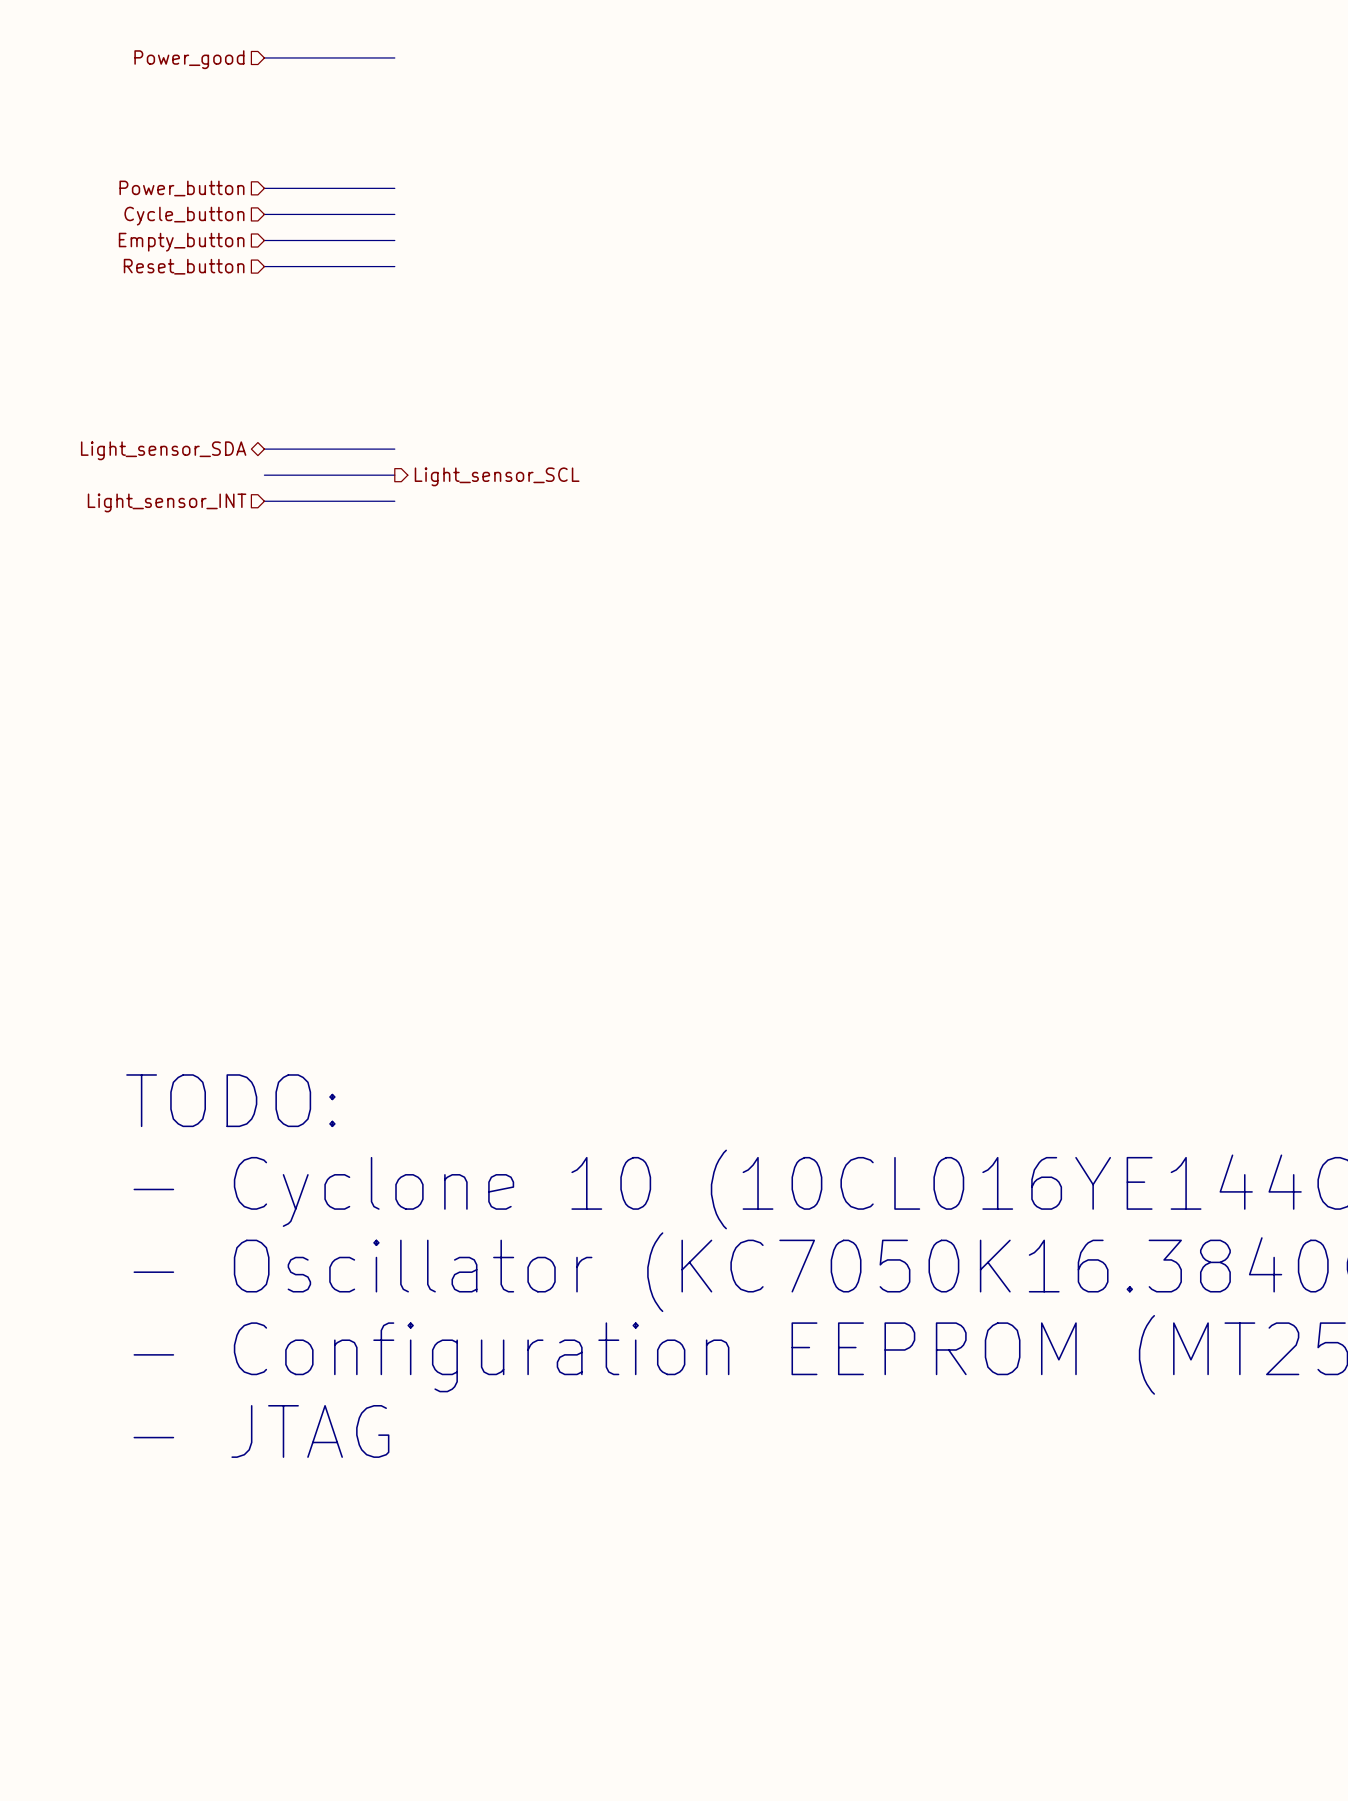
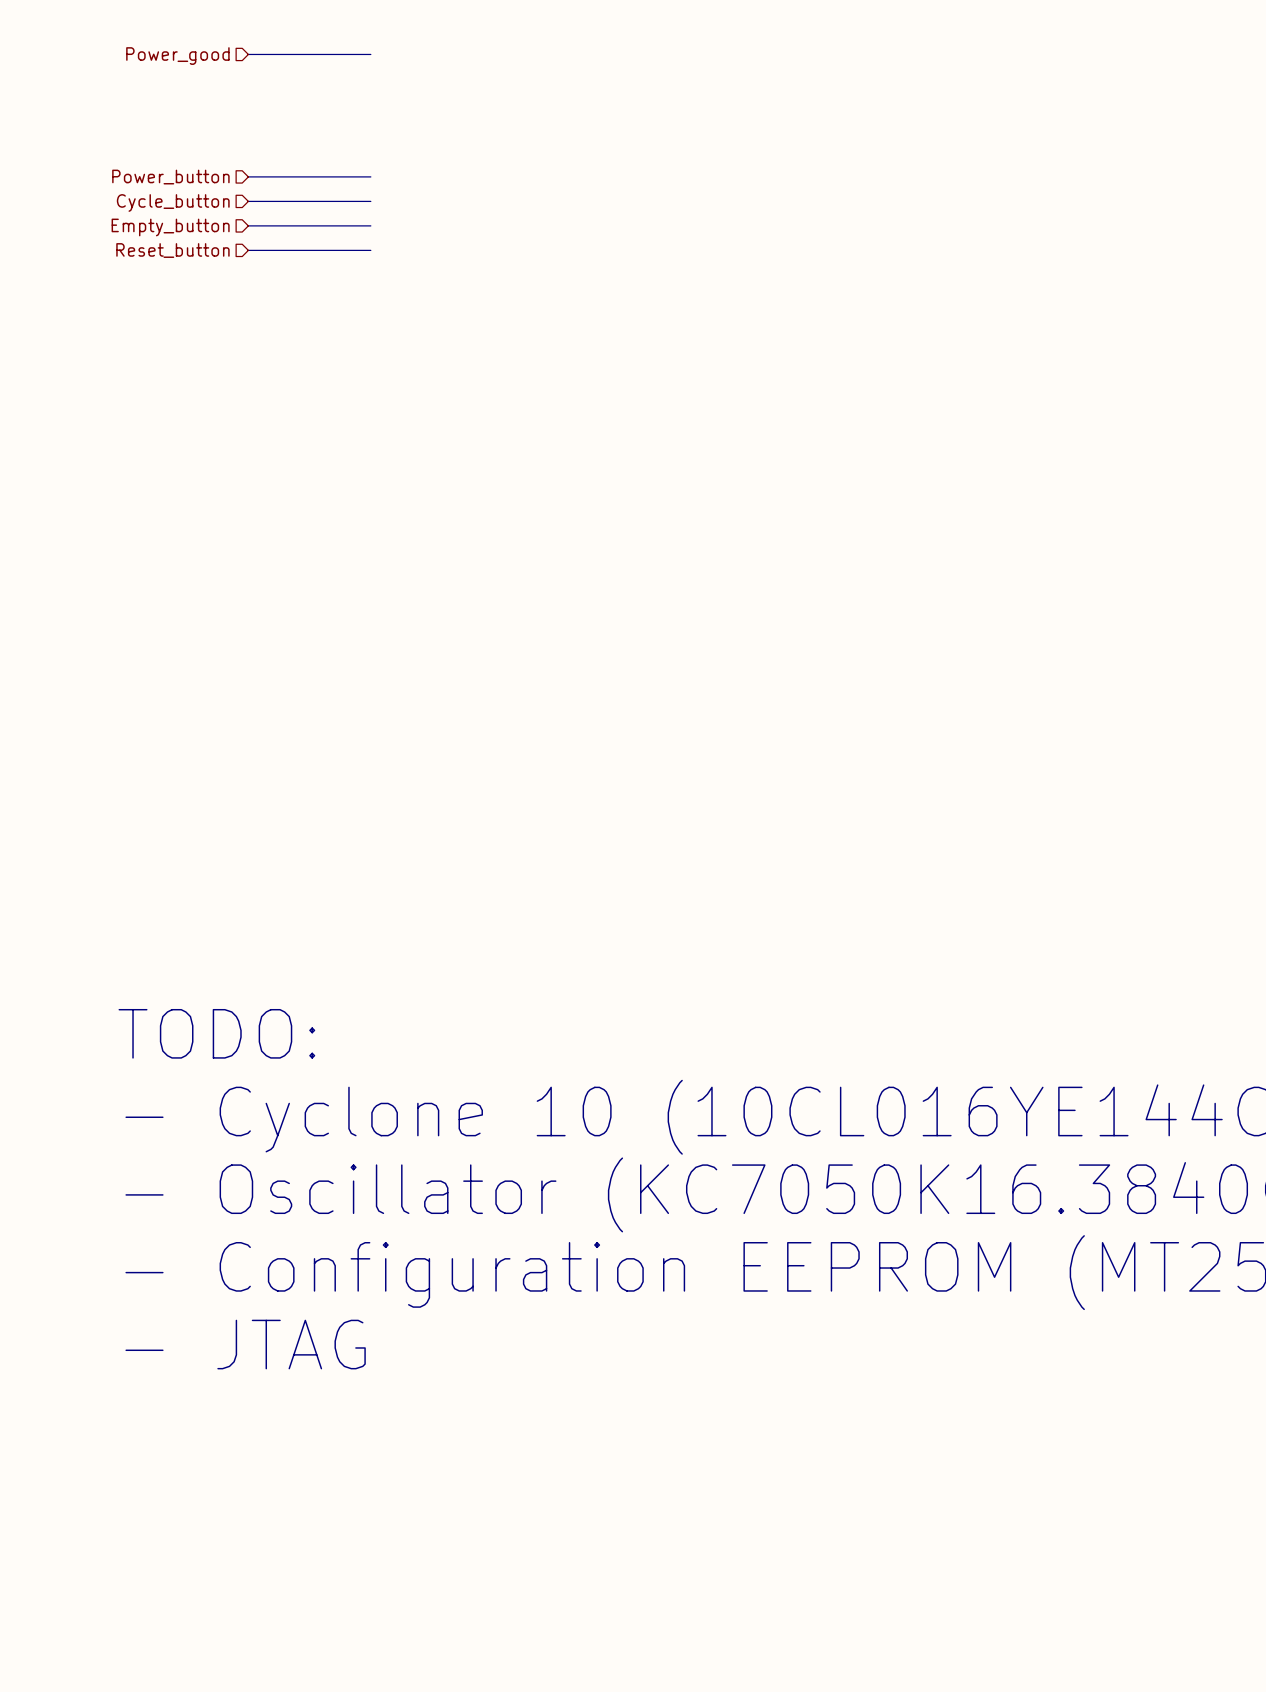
wire: (264, 449) (394, 449) -> none
hierarchical label: Light_sensor_SDA (163, 450) -> none
wire: (264, 475) (394, 475) -> none
hierarchical label: Light_sensor_SCL (497, 476) -> none
wire: (264, 501) (394, 501) -> none
hierarchical label: Light_sensor_INT (167, 502) -> none

